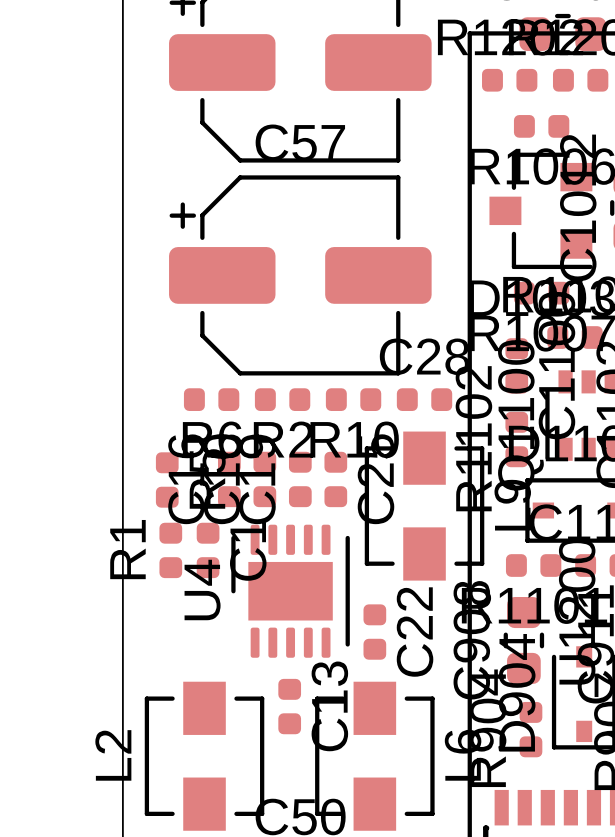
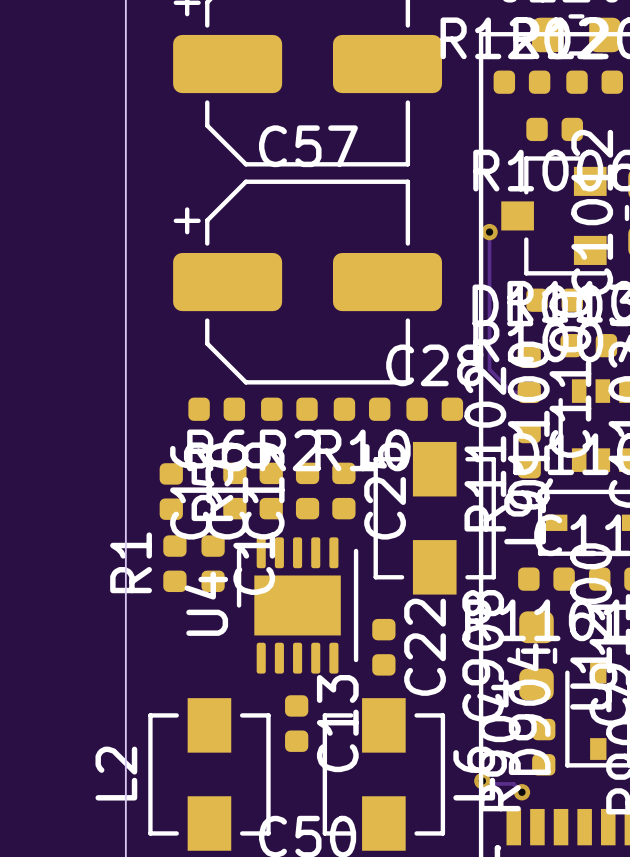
track: none -> (489, 232) (489, 369) (512, 392) (529, 392)
via: none -> (489, 232)
track: none -> (482, 780) (485, 783) (513, 783) (521, 792)
via: none -> (482, 780)
via: none -> (521, 792)

